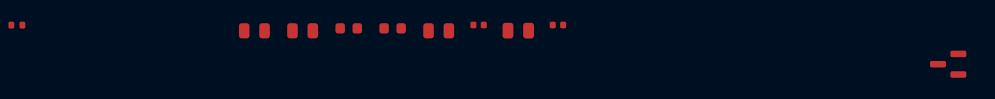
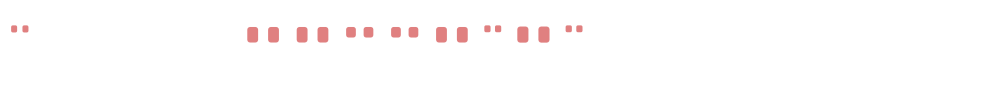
part: (948, 64) -> none

